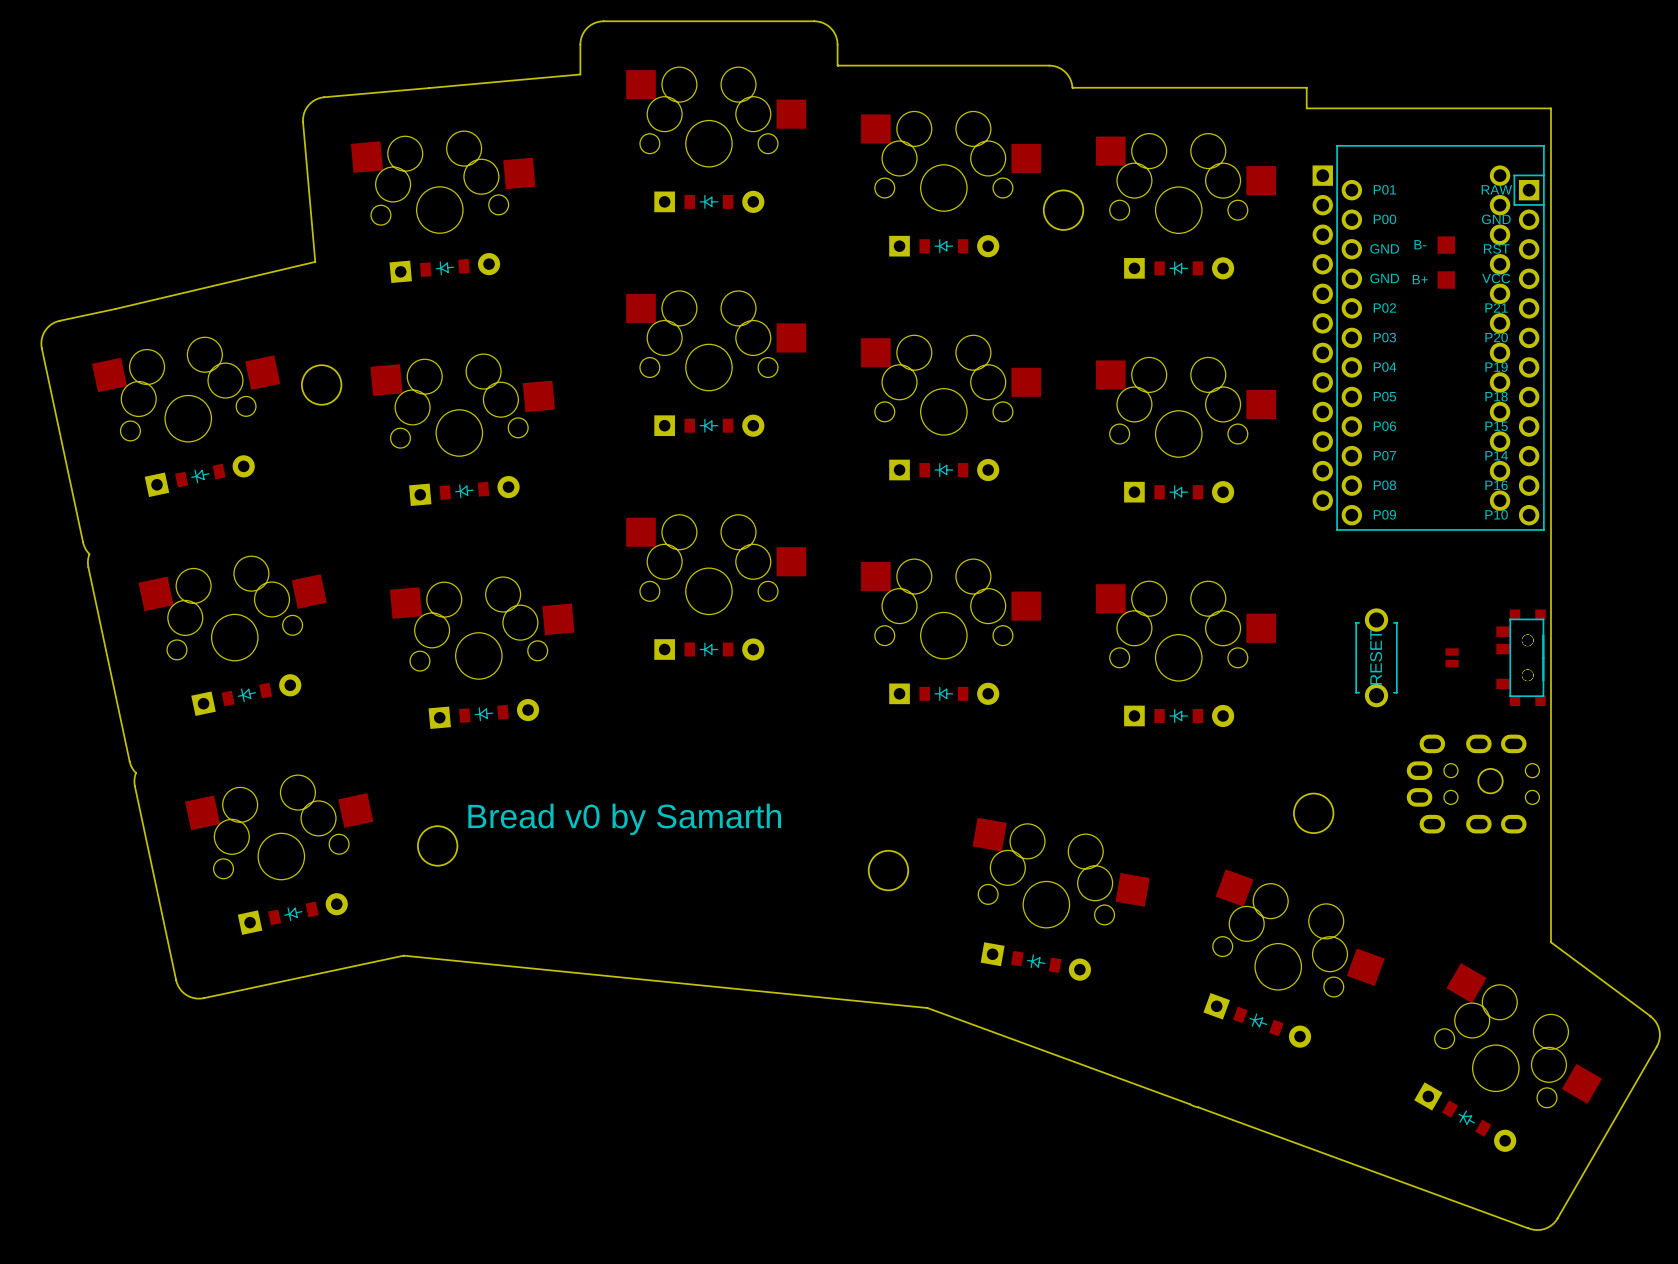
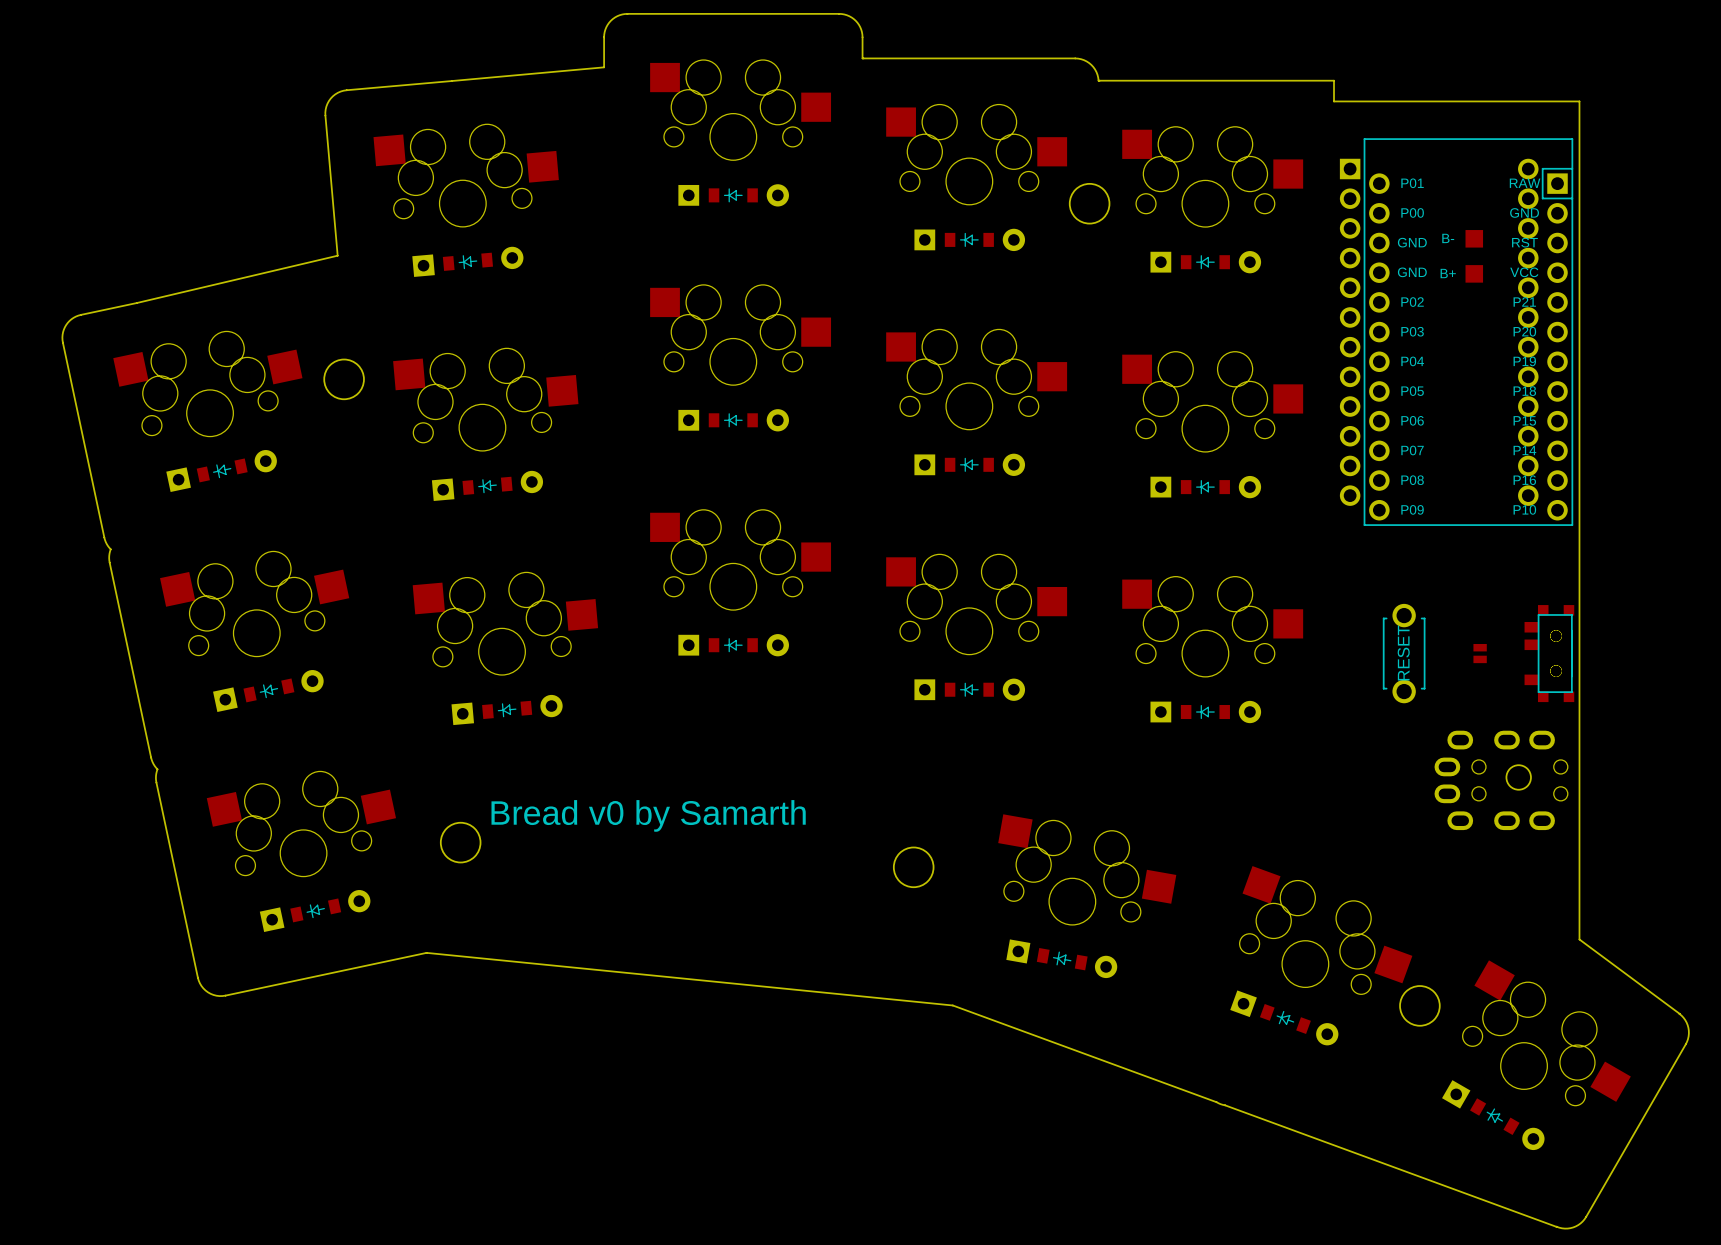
round board edge position: (1313, 813) -> (1419, 1005)

